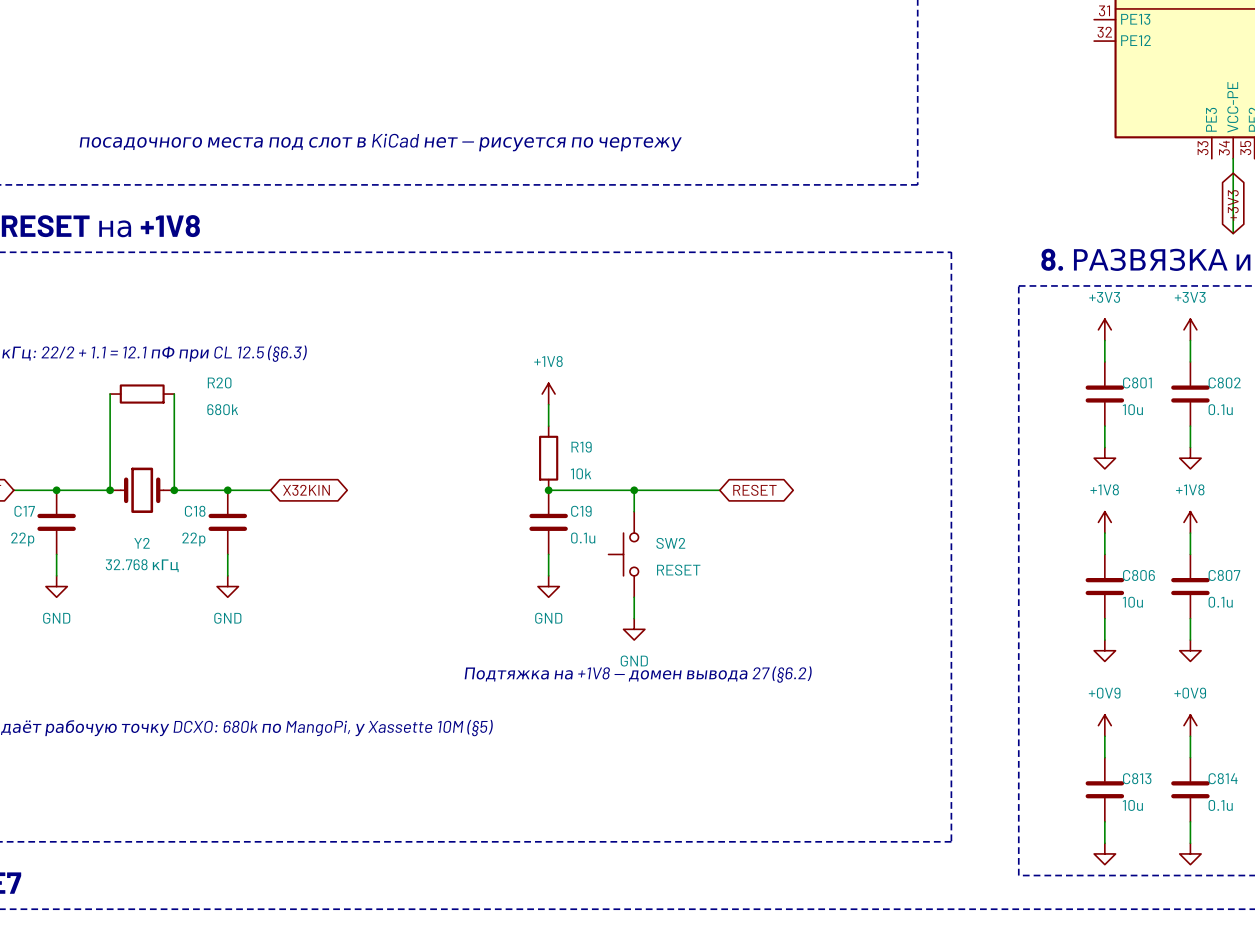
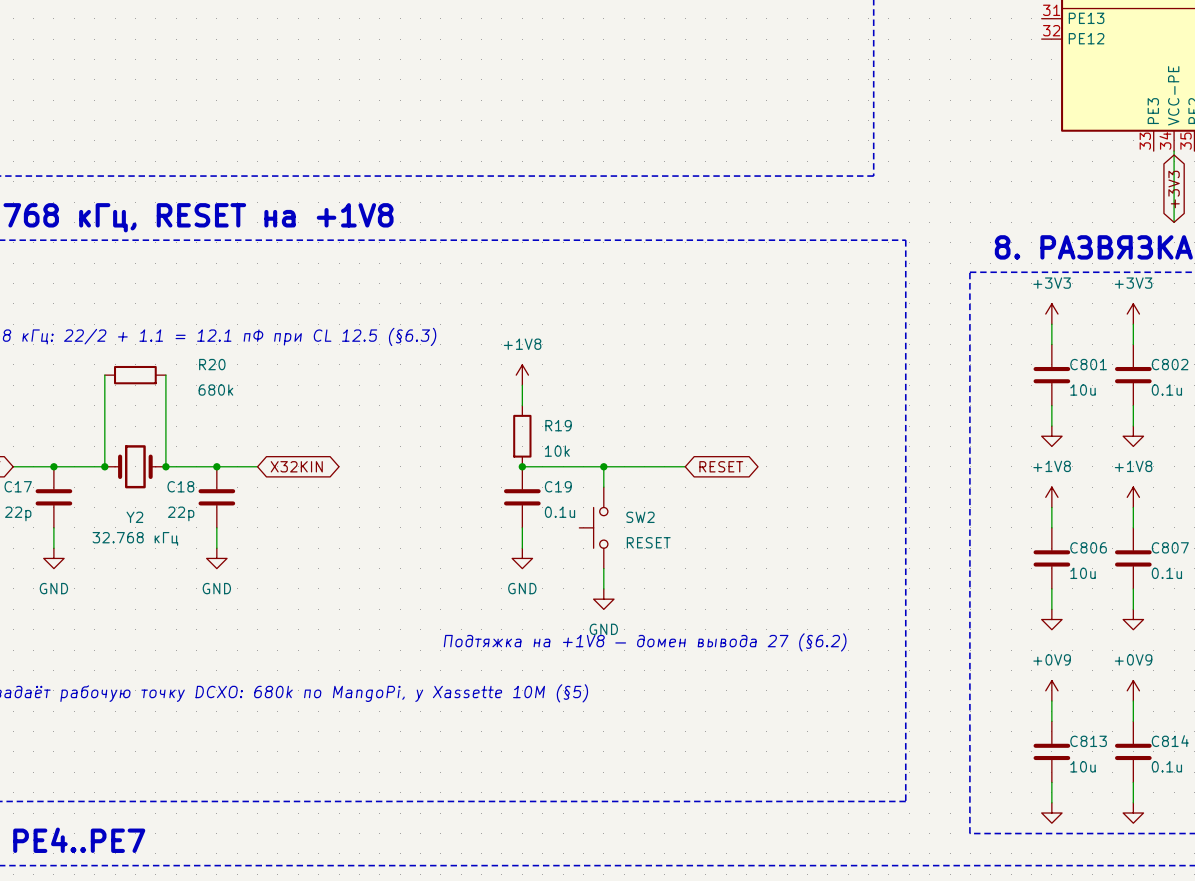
text: посадочного места под слот в KiCad нет — рисуется по чертежу (380, 142) -> none

